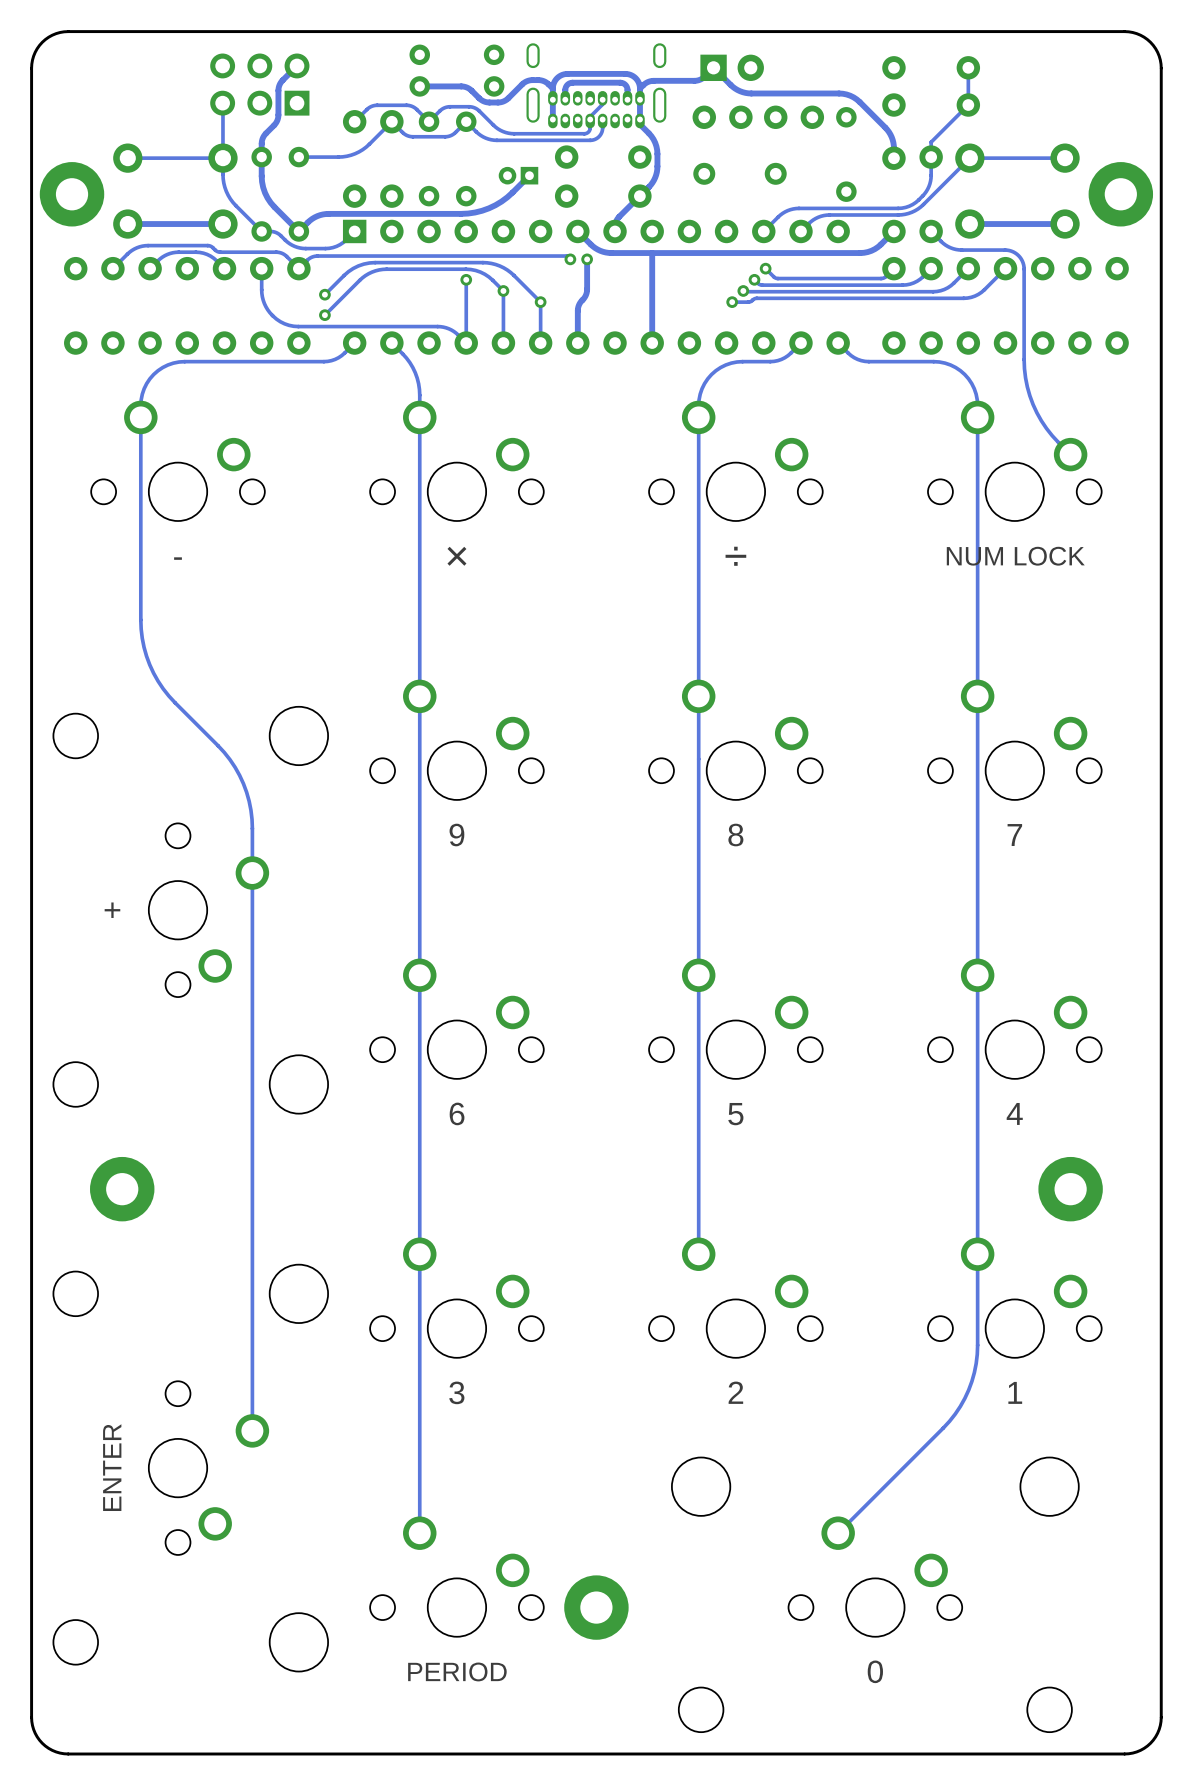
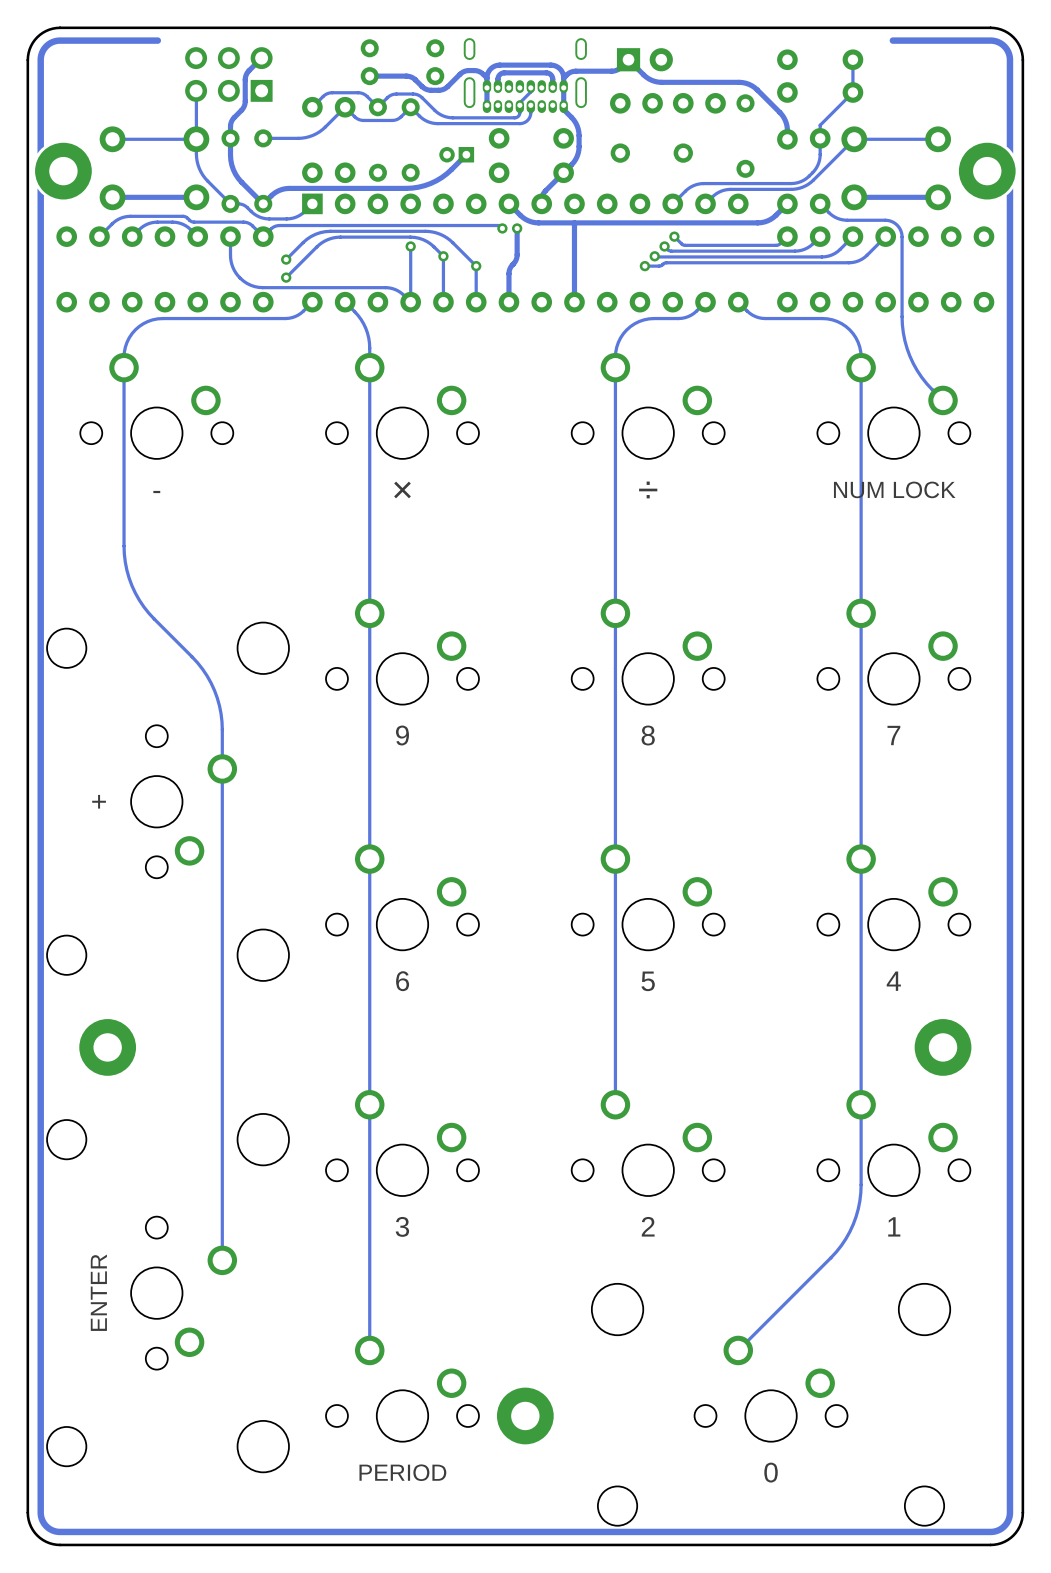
drawing: none -> [37, 37, 1014, 1536]

